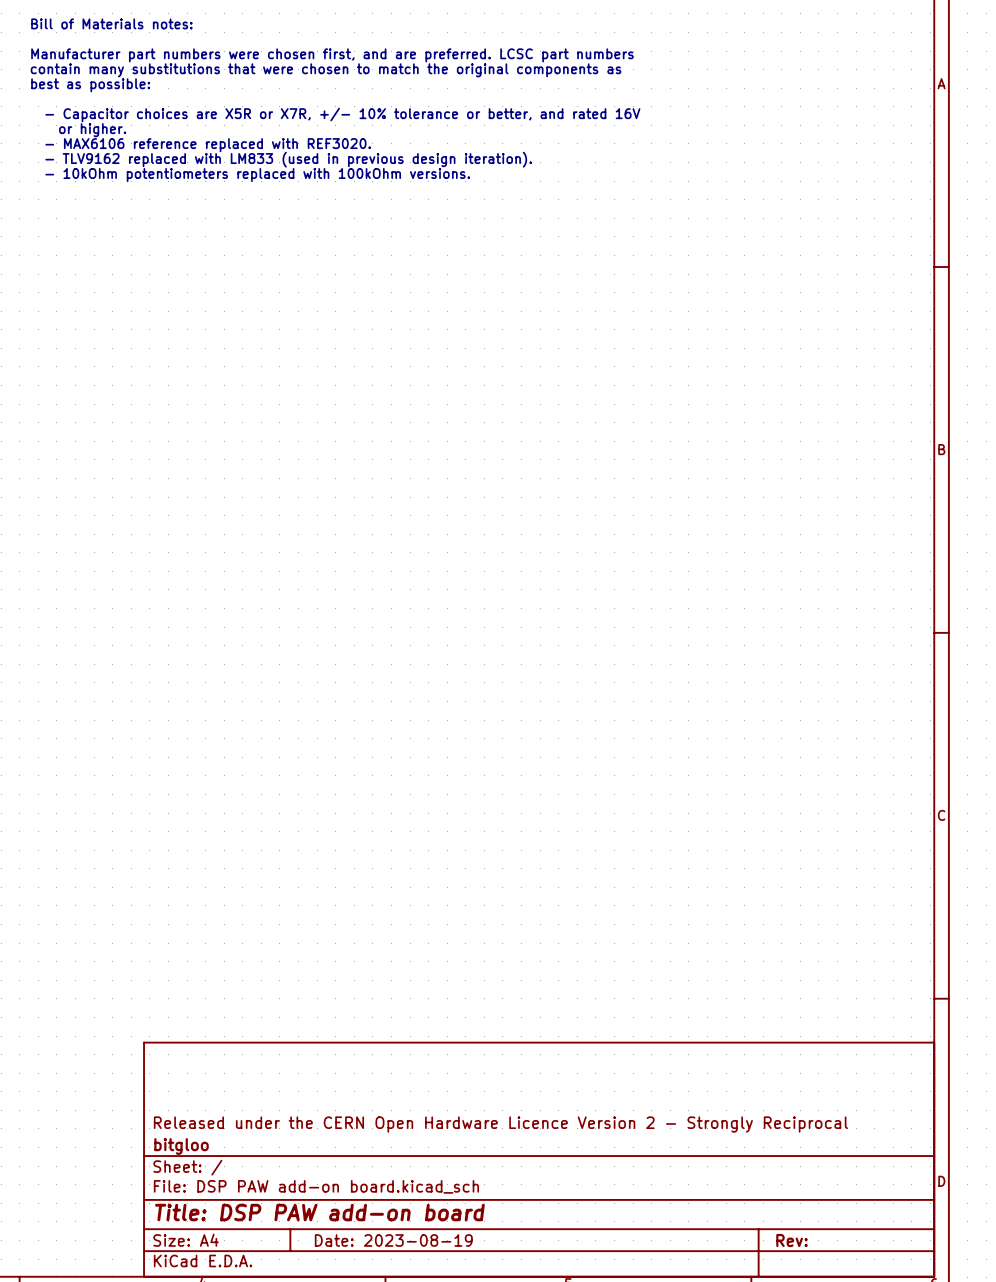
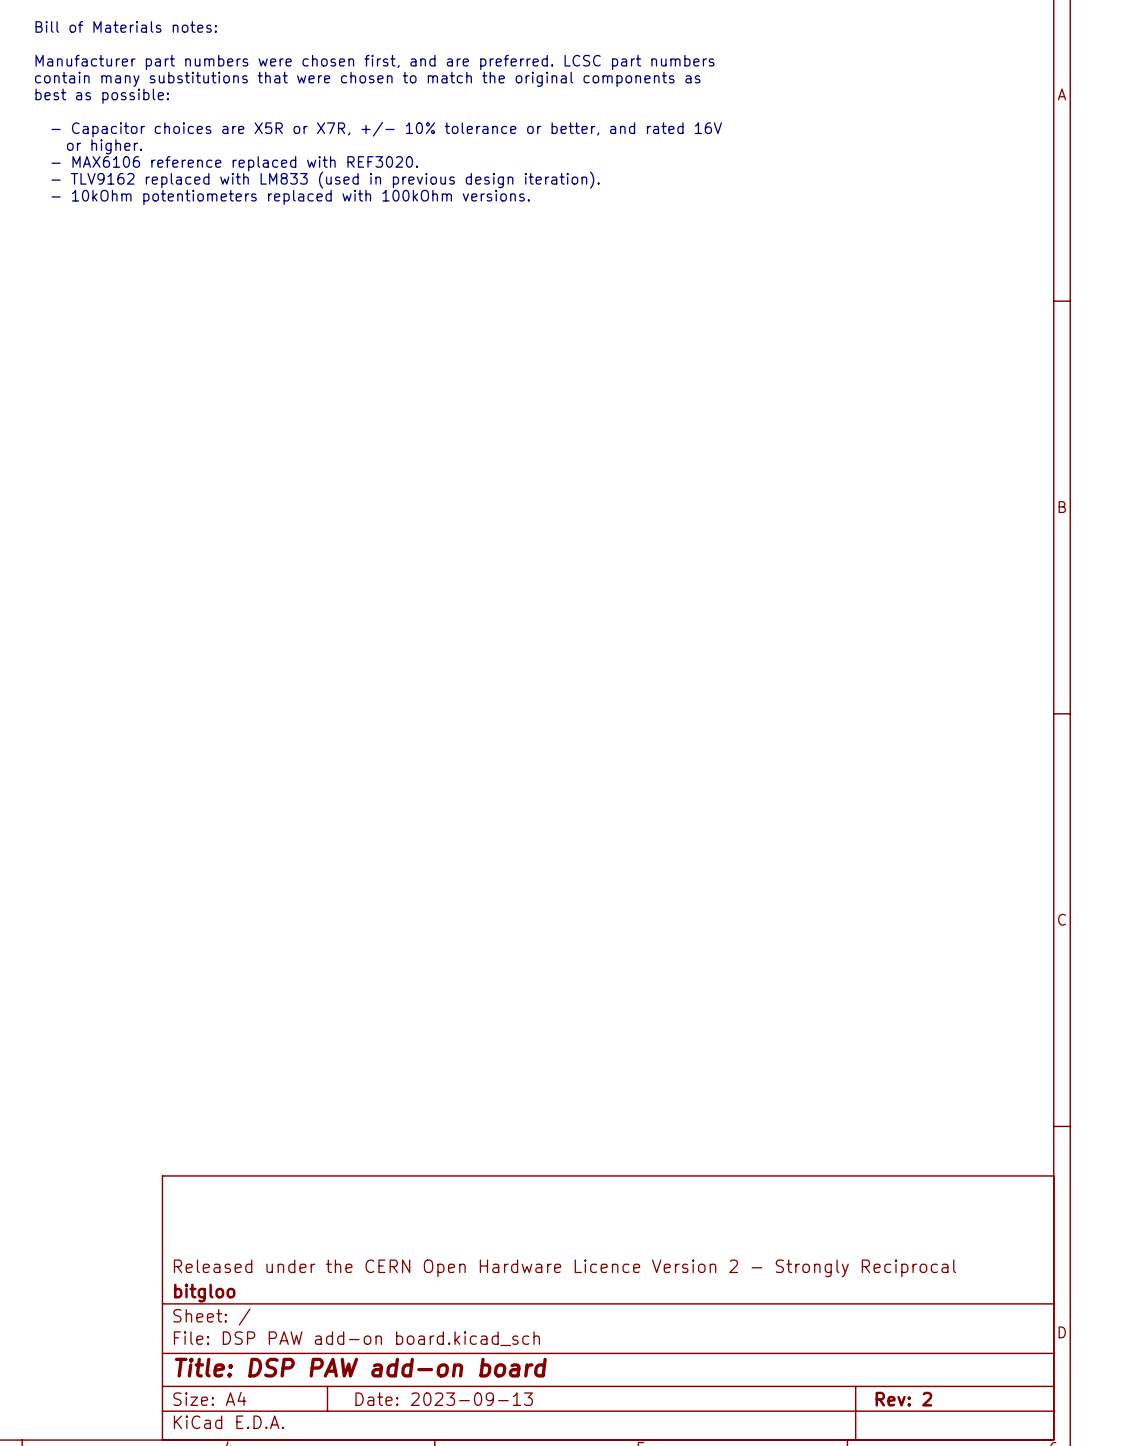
title block: Date: 2023-08-19 (393, 1240) -> Date: 2023-09-13 (444, 1399)
title block: Rev: (791, 1240) -> Rev: 2 (903, 1399)

